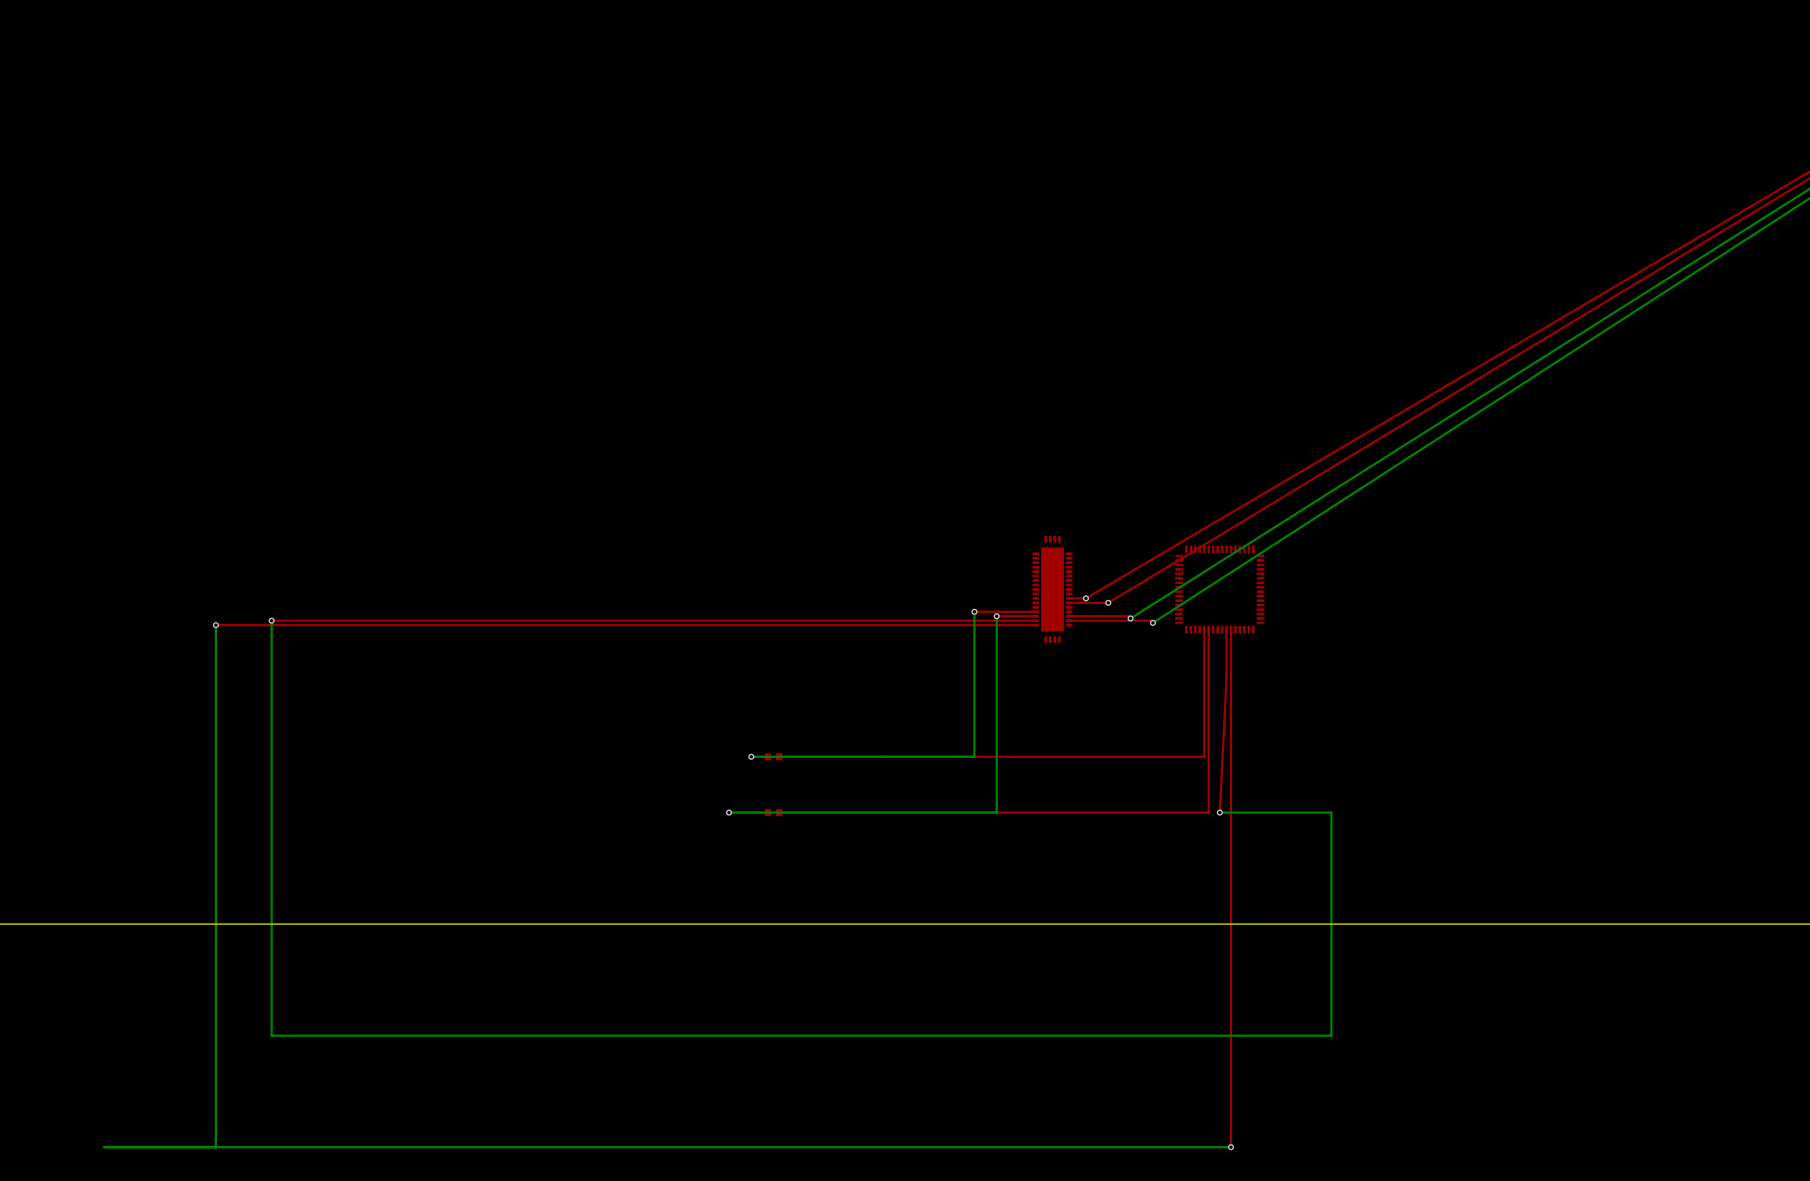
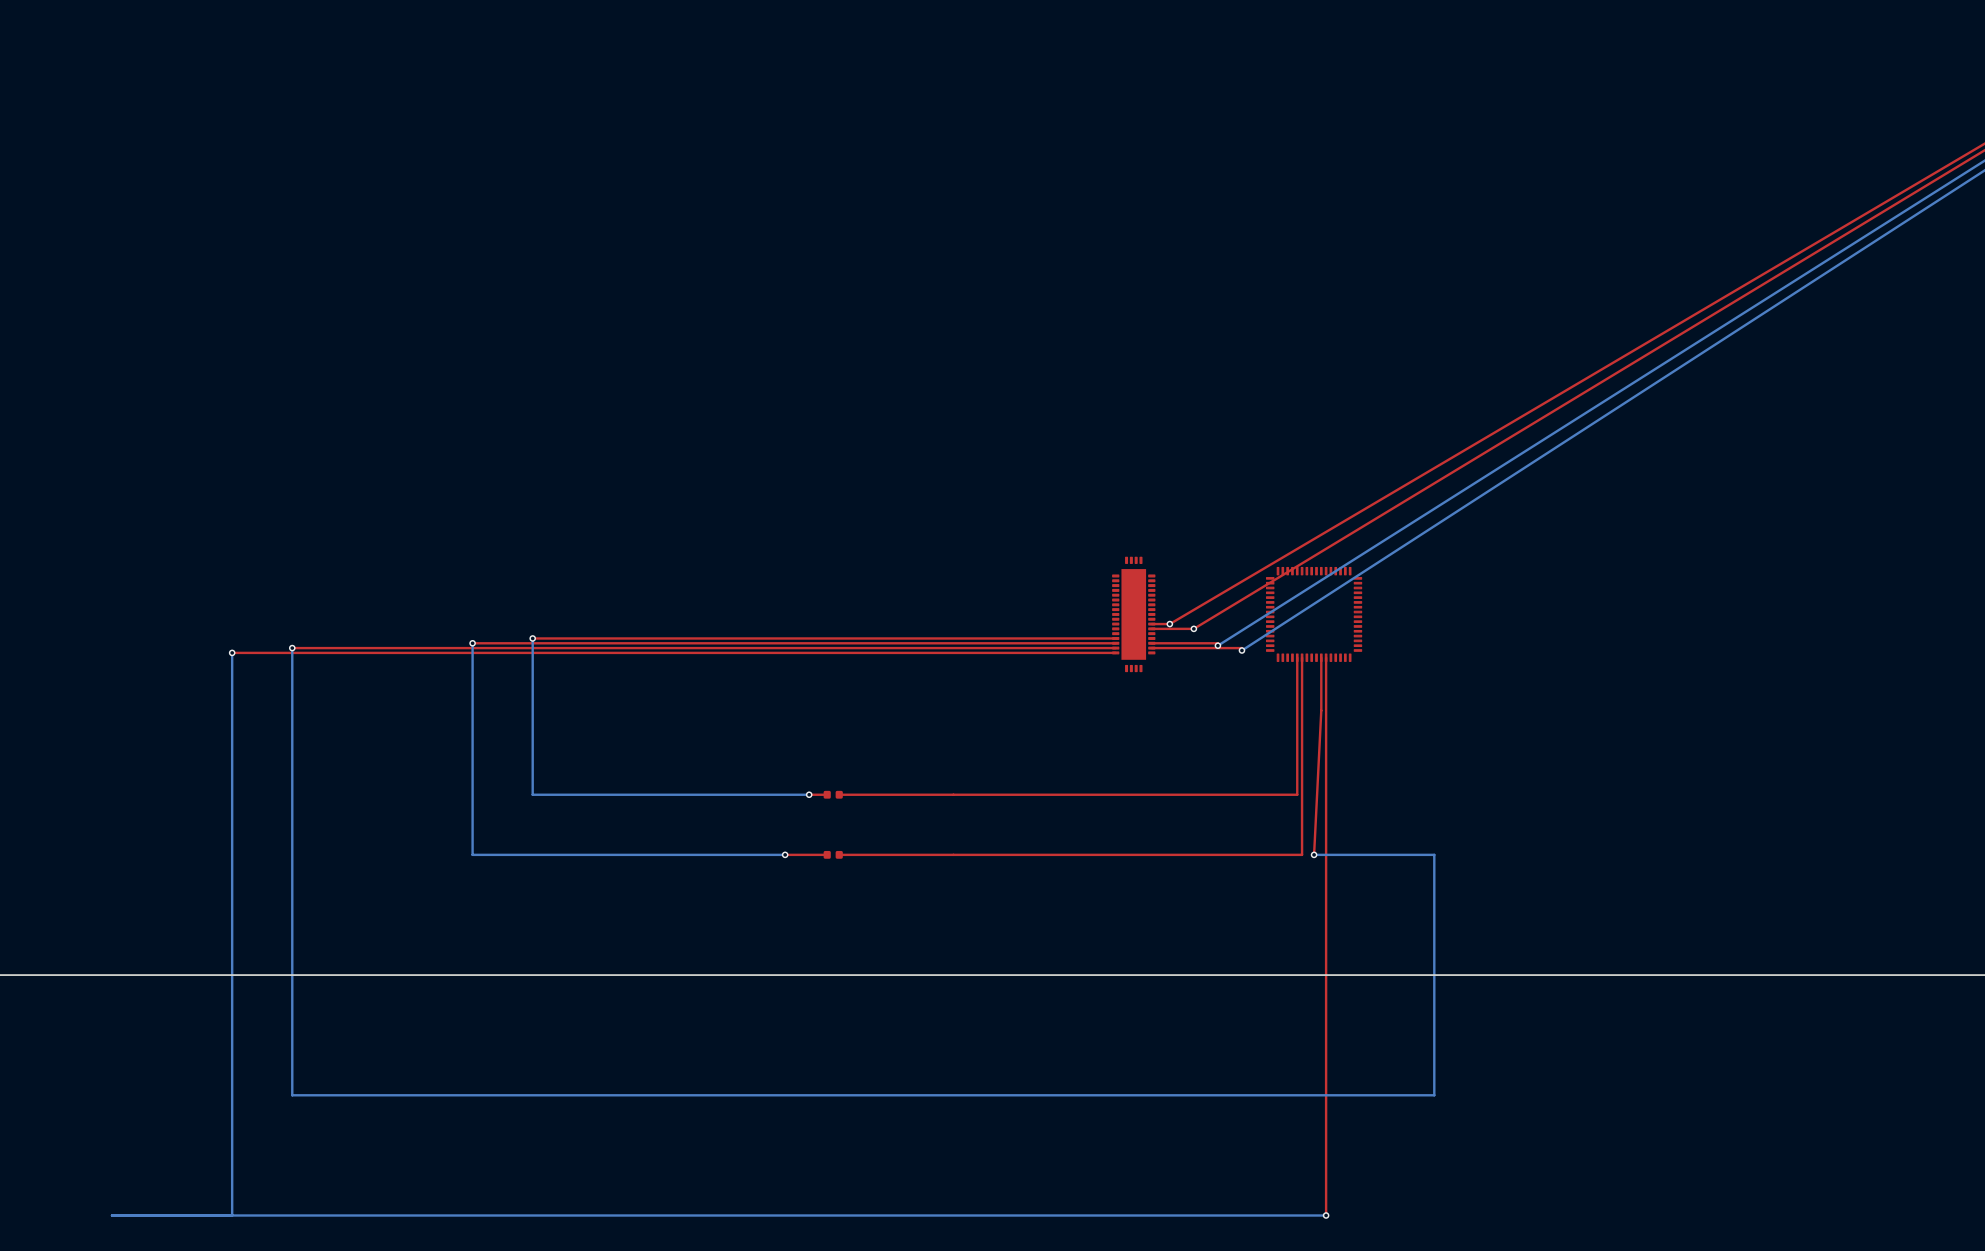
via: none -> (532, 638)
top track: none -> (1049, 638) (532, 638)
bottom track: (974, 611) (974, 756) (751, 756) -> (532, 638) (532, 794) (809, 794)
via: (974, 611) -> none
via: none -> (472, 643)
top track: none -> (1073, 643) (472, 643)
bottom track: (996, 616) (996, 812) (729, 812) -> (472, 643) (472, 854) (785, 854)
via: (996, 616) -> none

